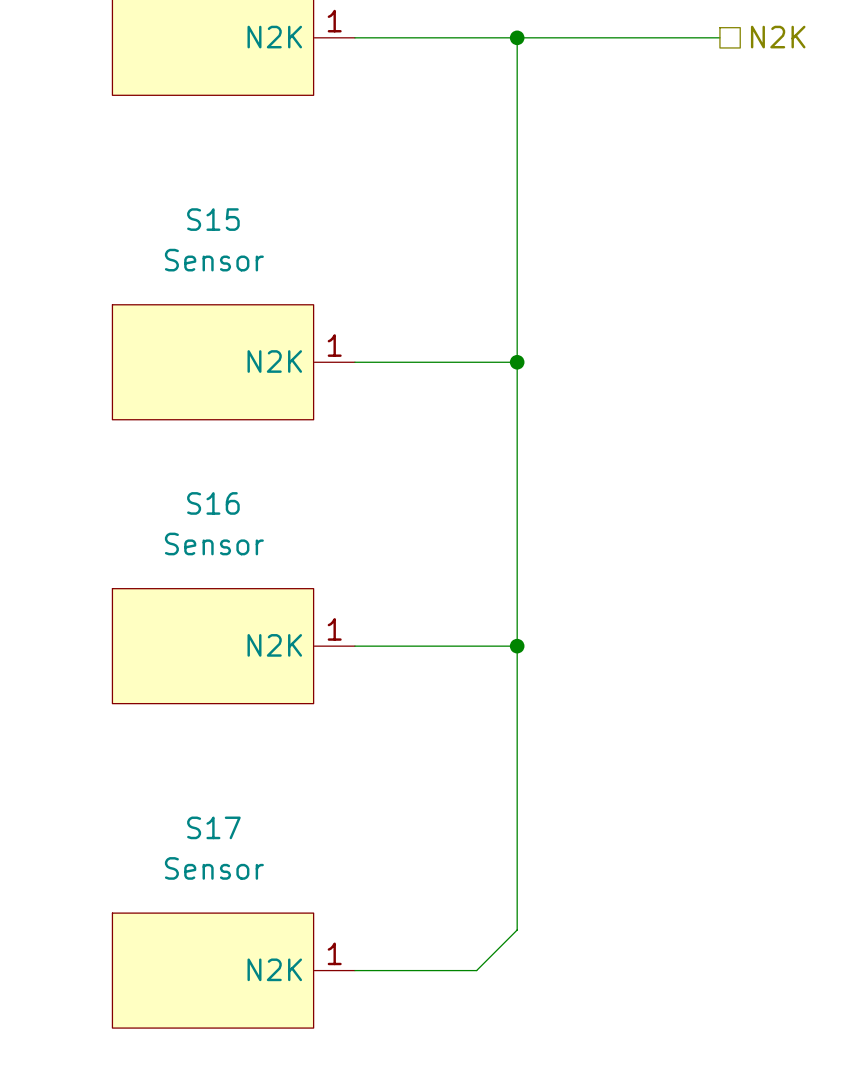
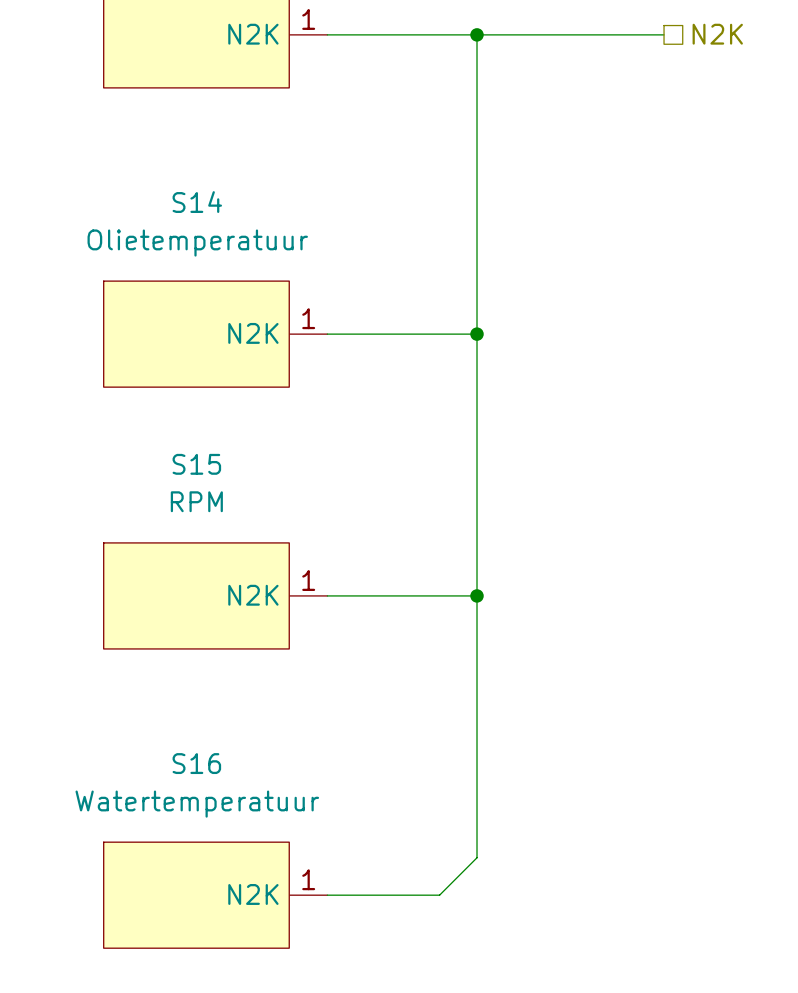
S15 name: S15 (213, 219) -> S14 (197, 202)
S15 value: Sensor (214, 260) -> Olietemperatuur (197, 243)
S16 name: S16 (213, 503) -> S15 (196, 464)
S16 value: Sensor (214, 544) -> RPM (196, 501)
S17 name: S17 (213, 827) -> S16 (196, 763)
S17 value: Sensor (214, 868) -> Watertemperatuur (197, 804)

